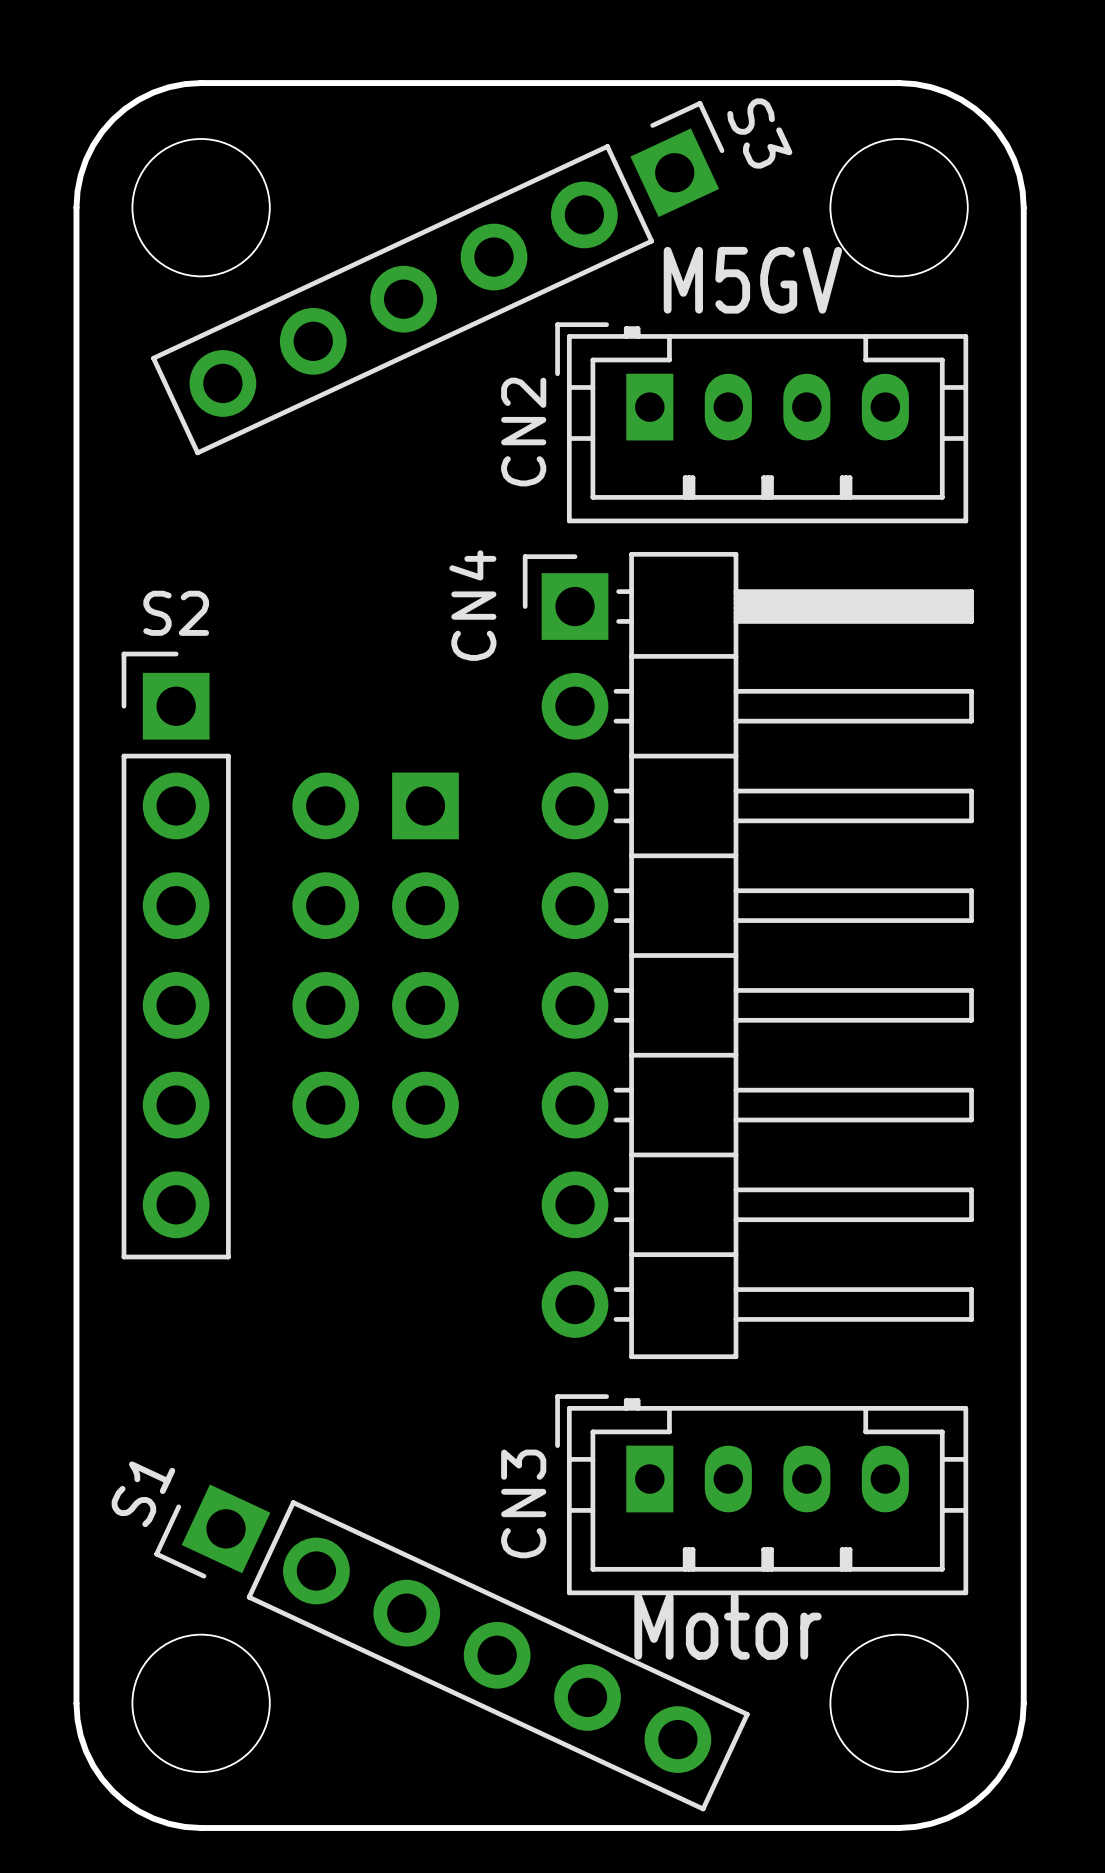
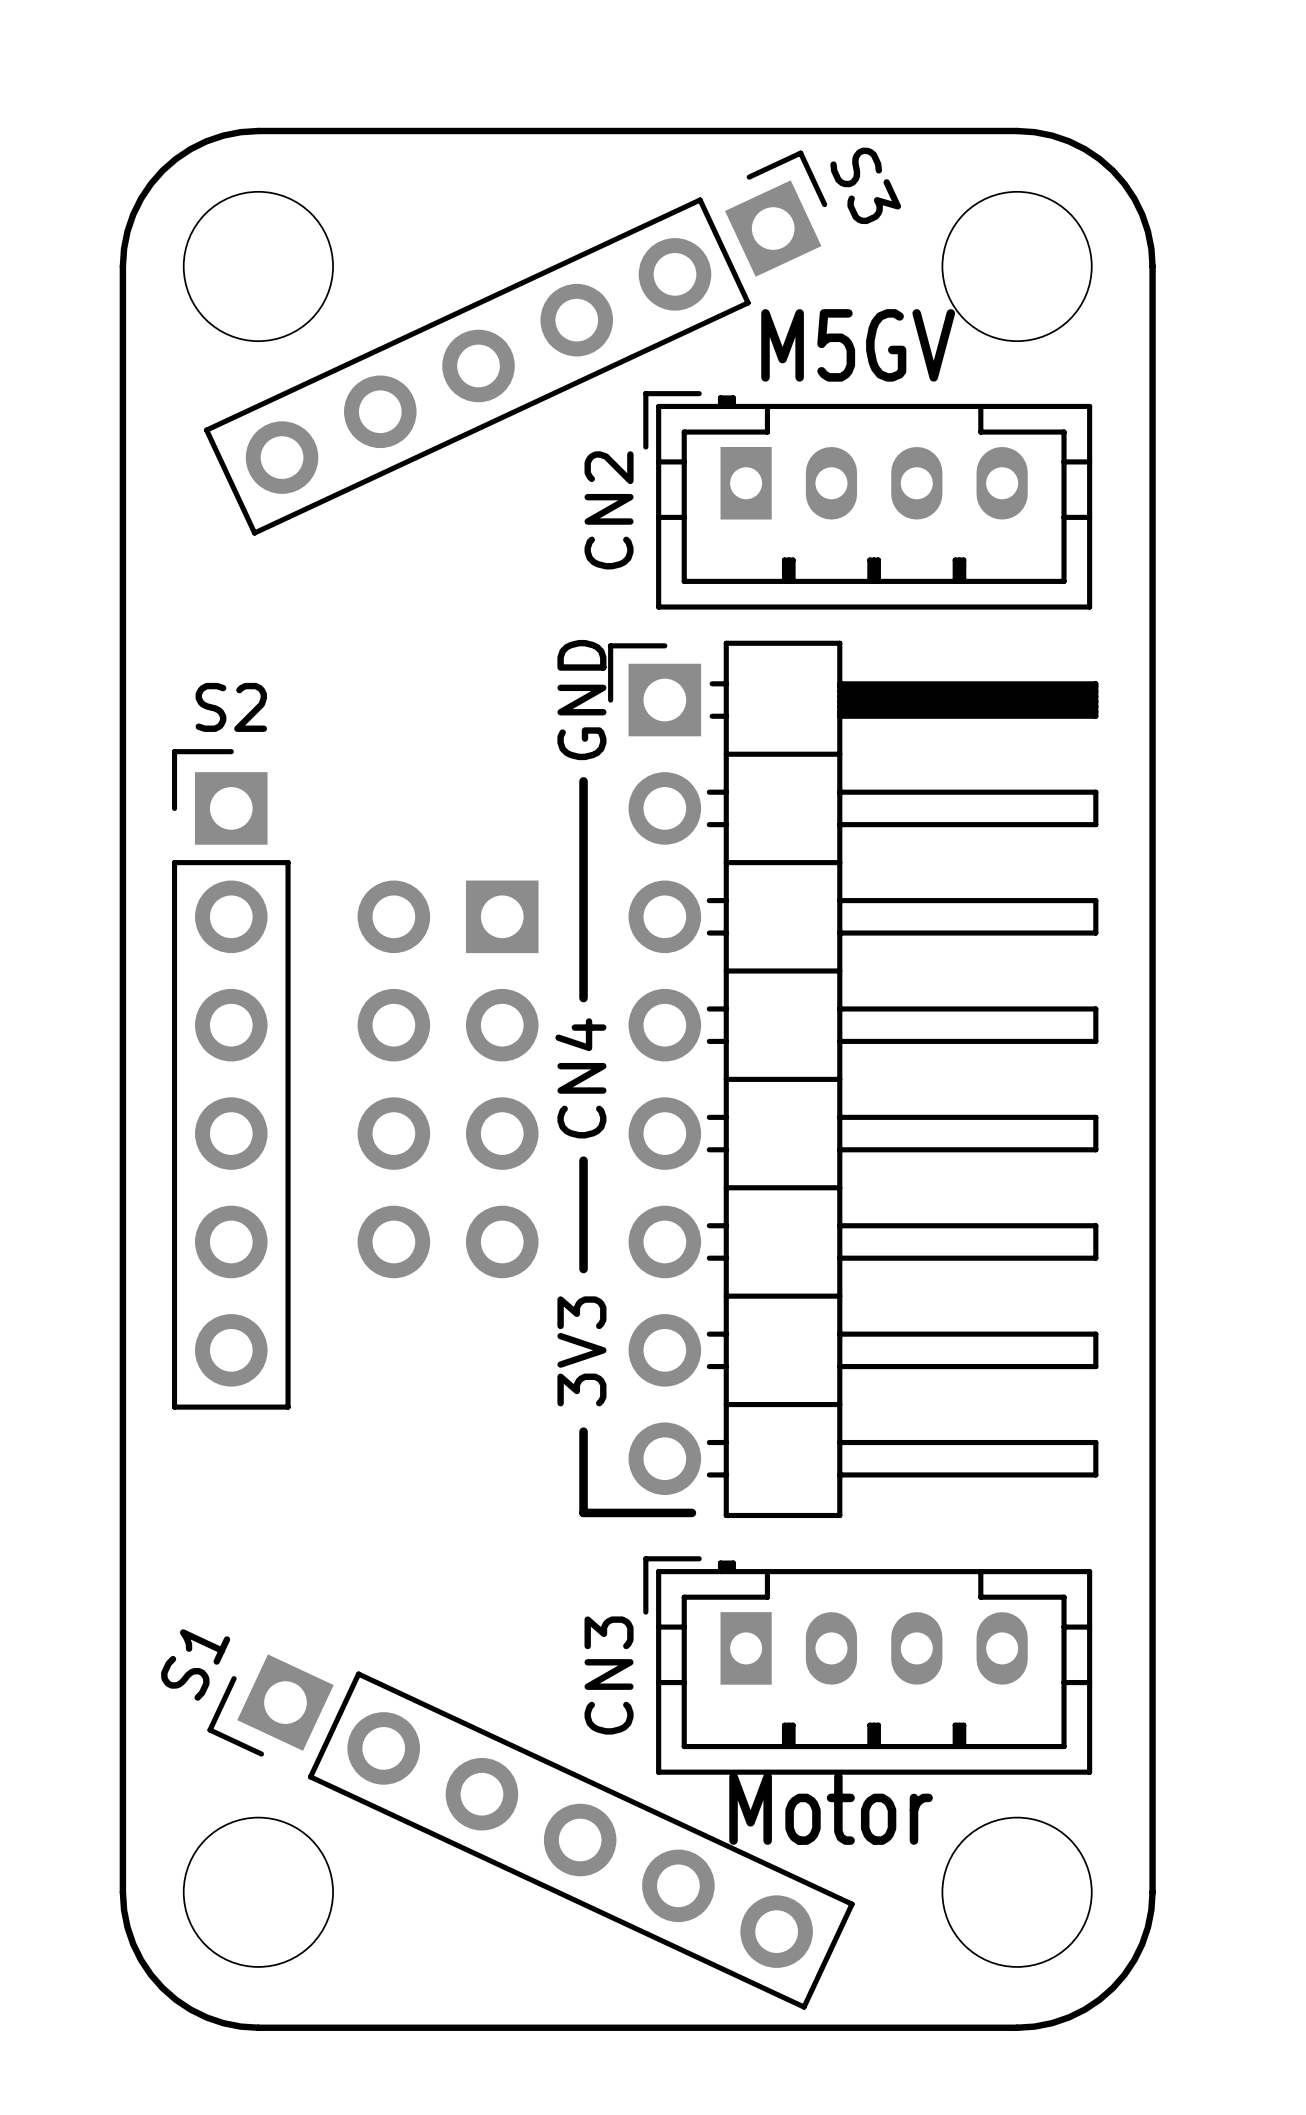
CN4 name position: CN4 (472, 605) -> CN4 (580, 1078)
text: none -> GND (581, 700)
line: none -> (583, 781) (583, 998)
line: none -> (583, 1160) (583, 1269)
text: none -> 3V3 (581, 1351)
line: none -> (583, 1431) (583, 1512) (691, 1512)

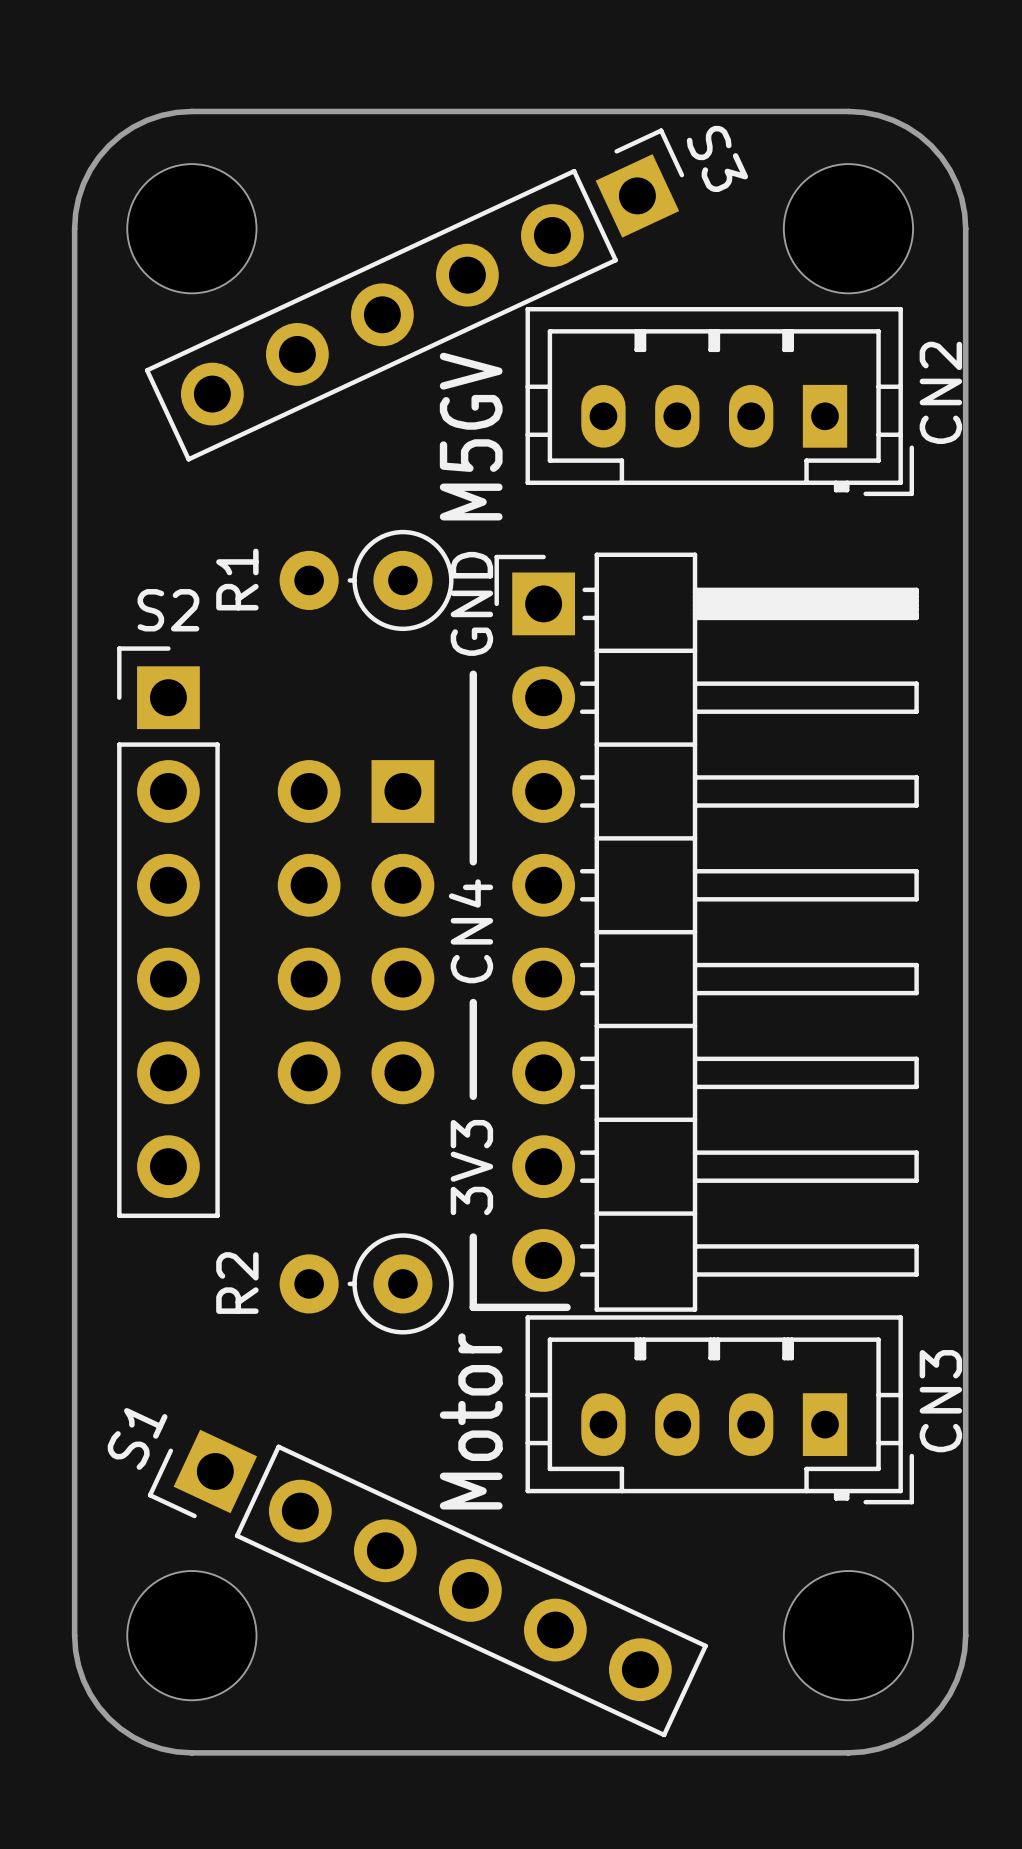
text rotation: 0° (858, 345) -> 90° counterclockwise (471, 436)
text position: M5GV (858, 345) -> M5GV (471, 436)
CN2 rotation: 0° (867, 500) -> 180° (719, 401)
R1: none -> (366, 580)
R2: none -> (366, 1283)
CN3 rotation: 0° (867, 1665) -> 180° (719, 1409)
text rotation: 0° (831, 1808) -> 90° counterclockwise (471, 1421)
text position: Motor (831, 1808) -> Motor (471, 1421)

